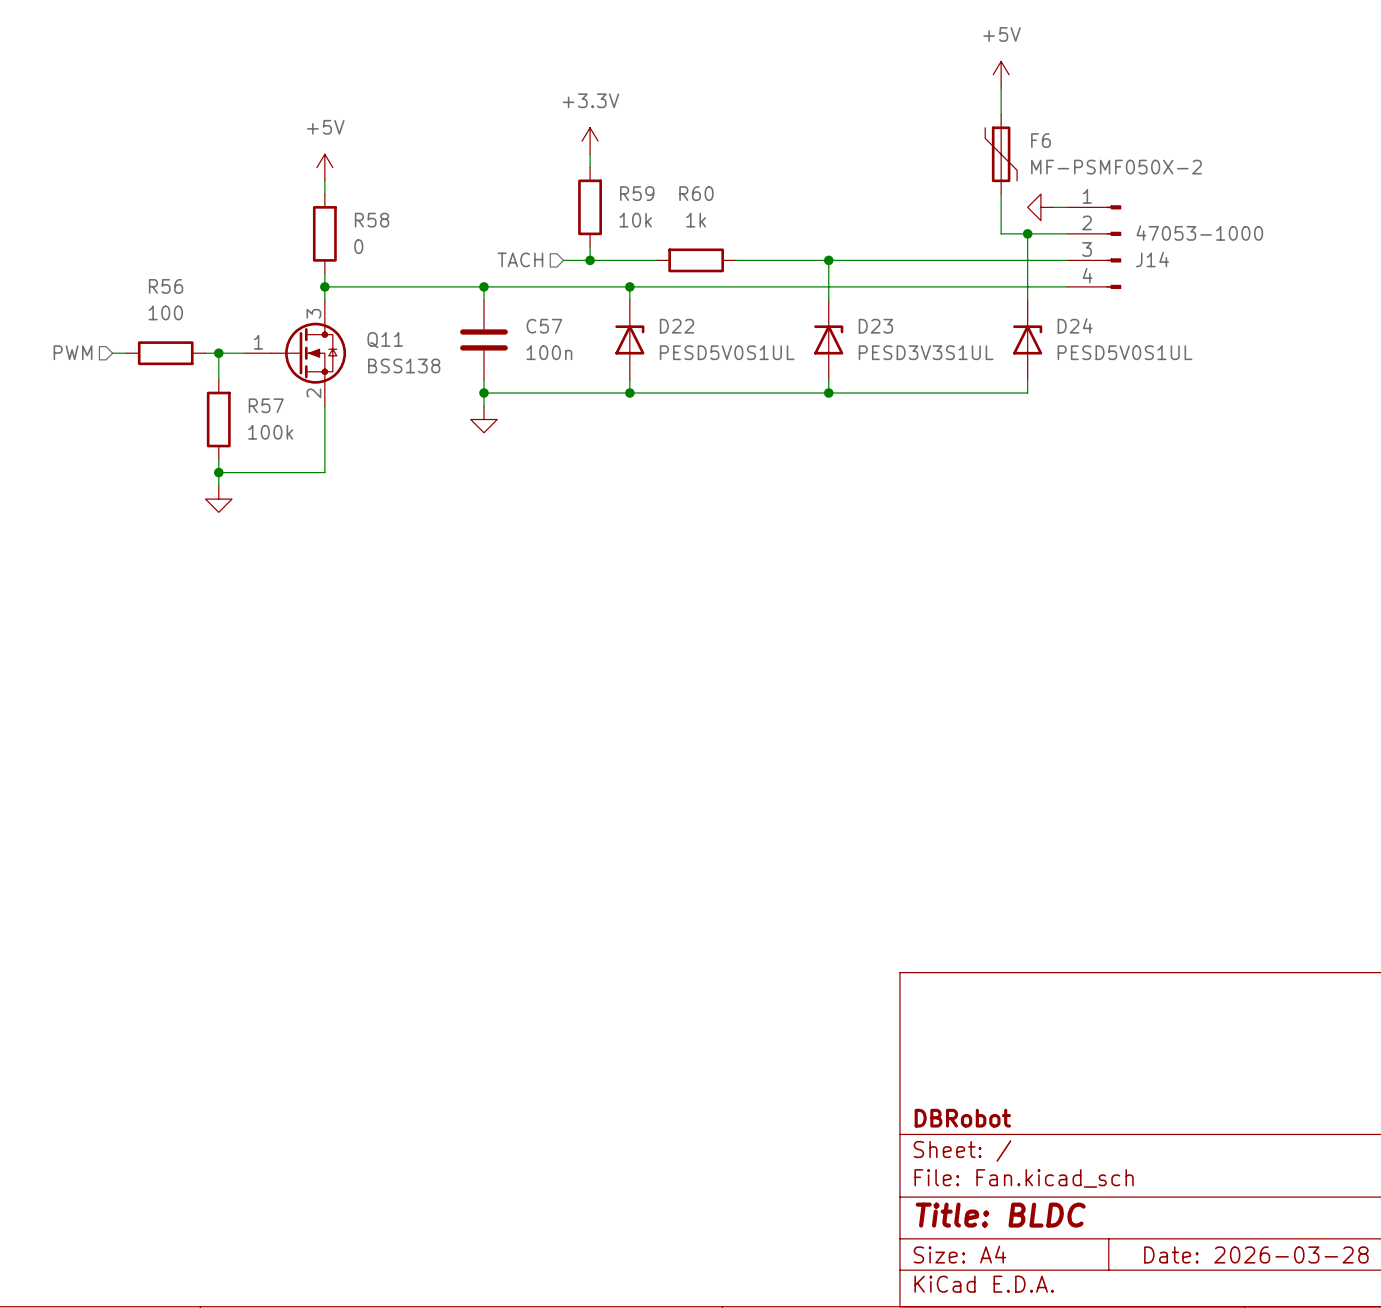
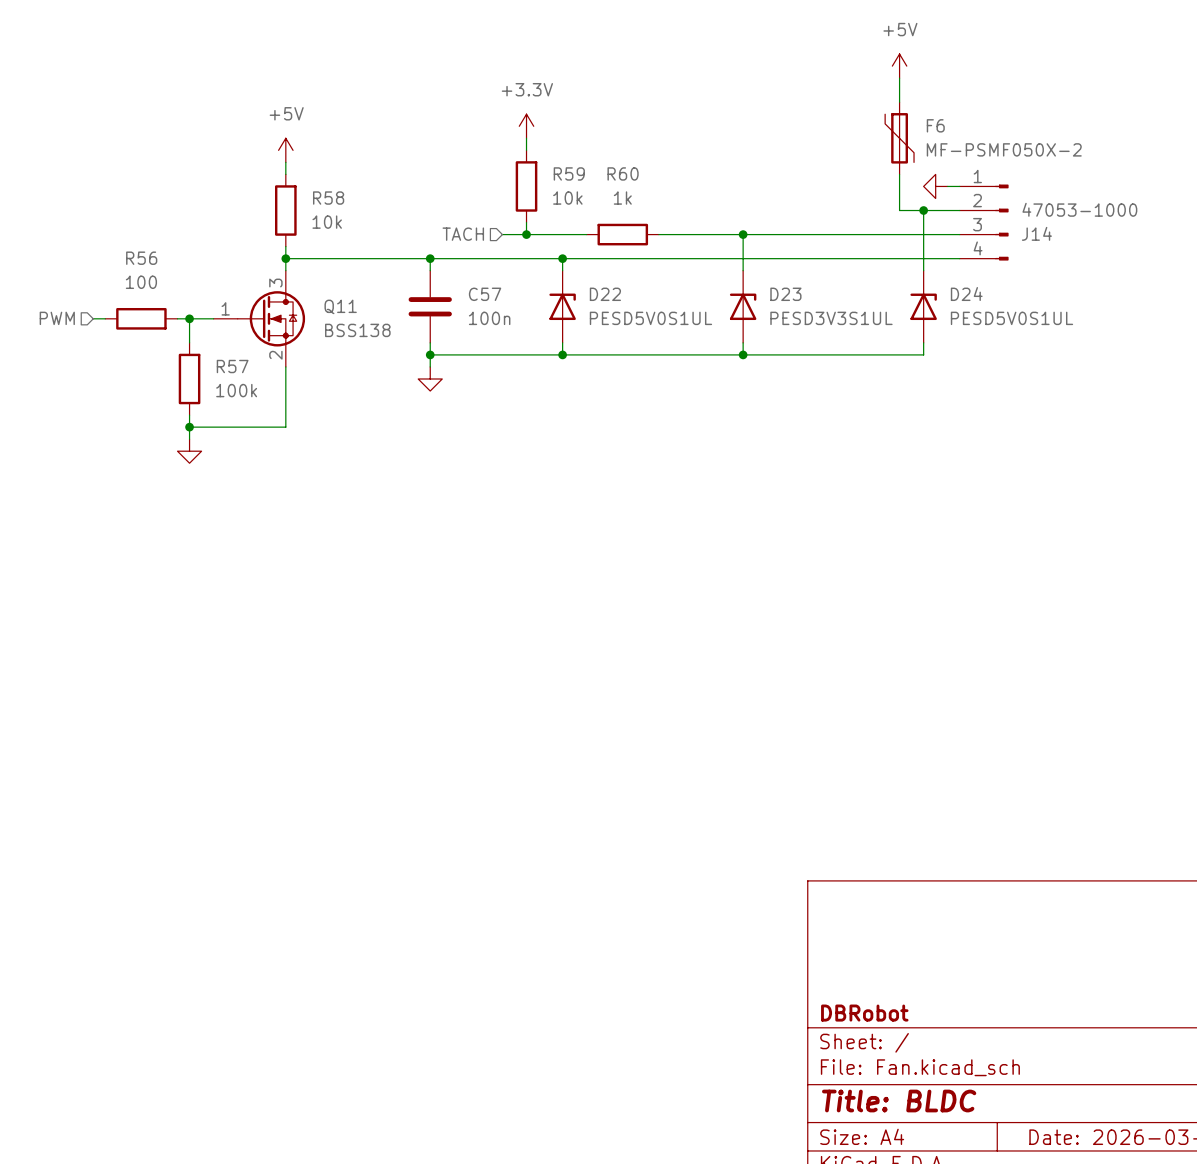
R58 value: 0 (358, 246) -> 10k (327, 222)

